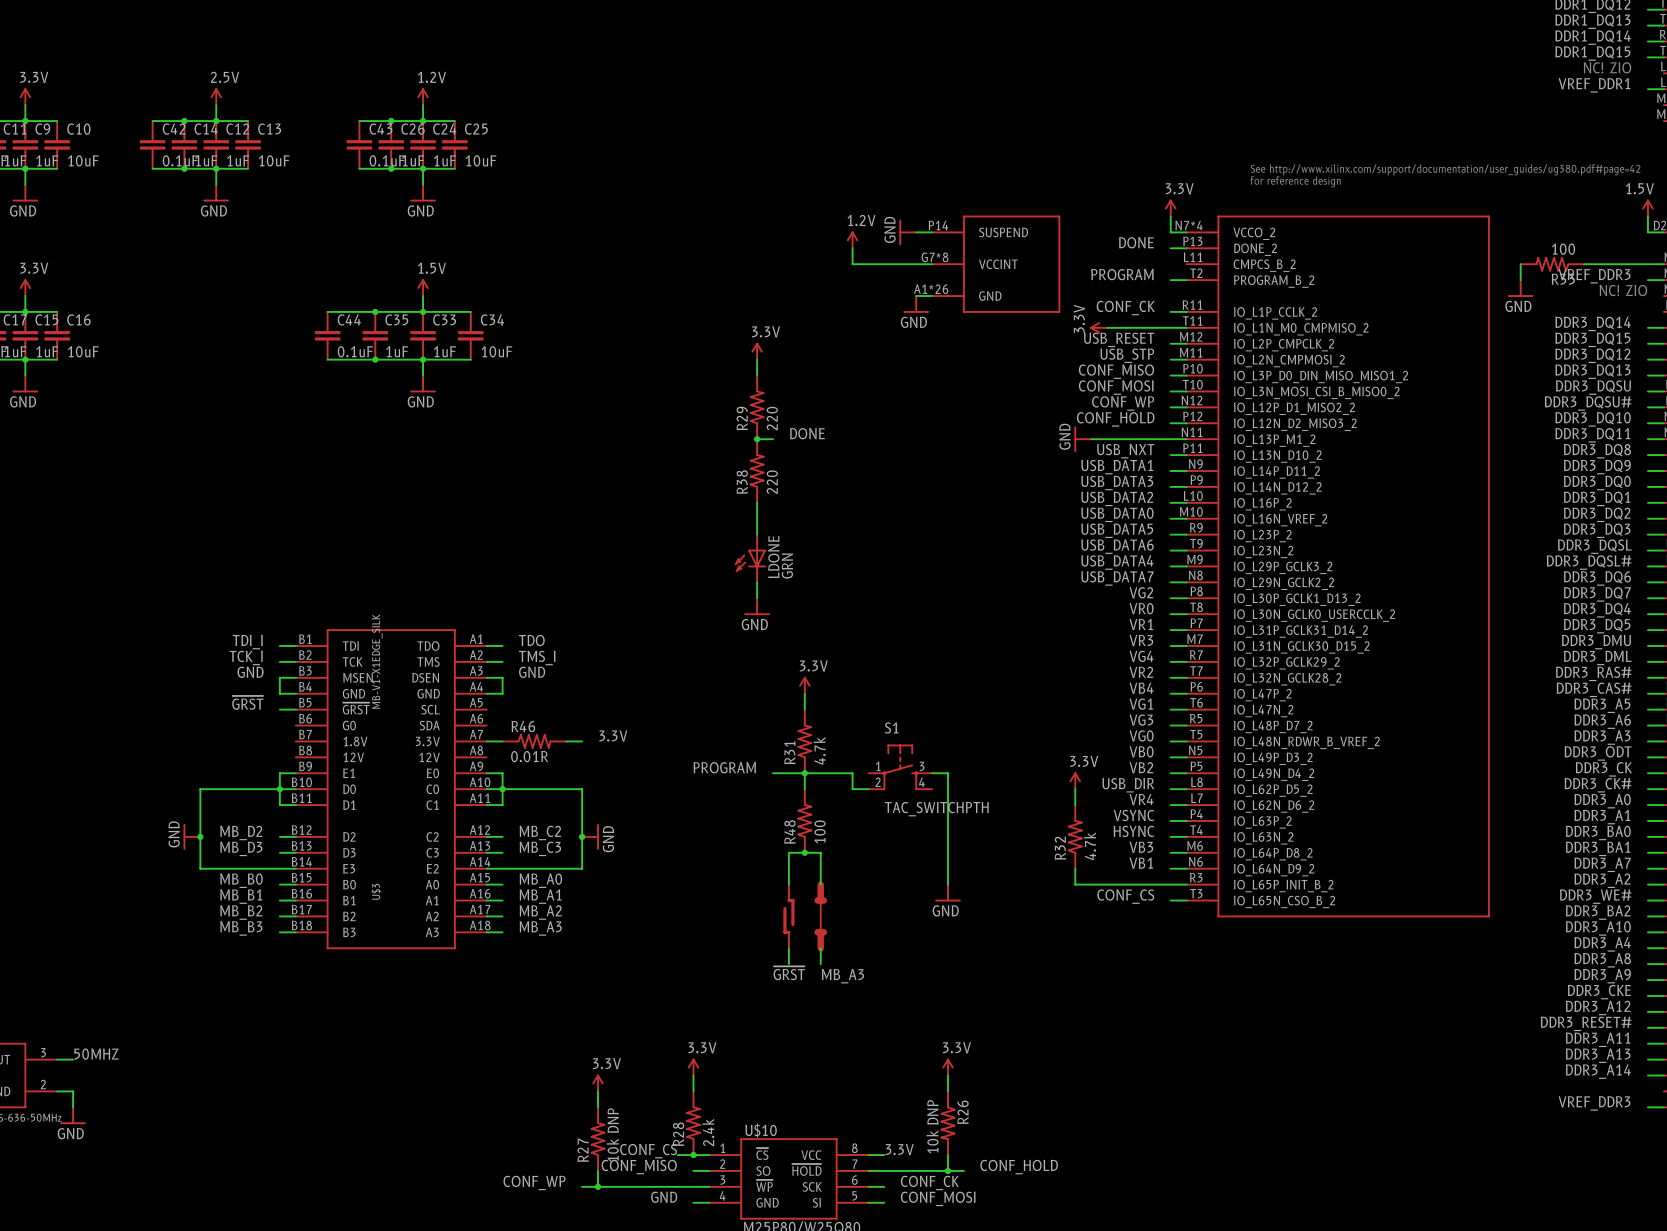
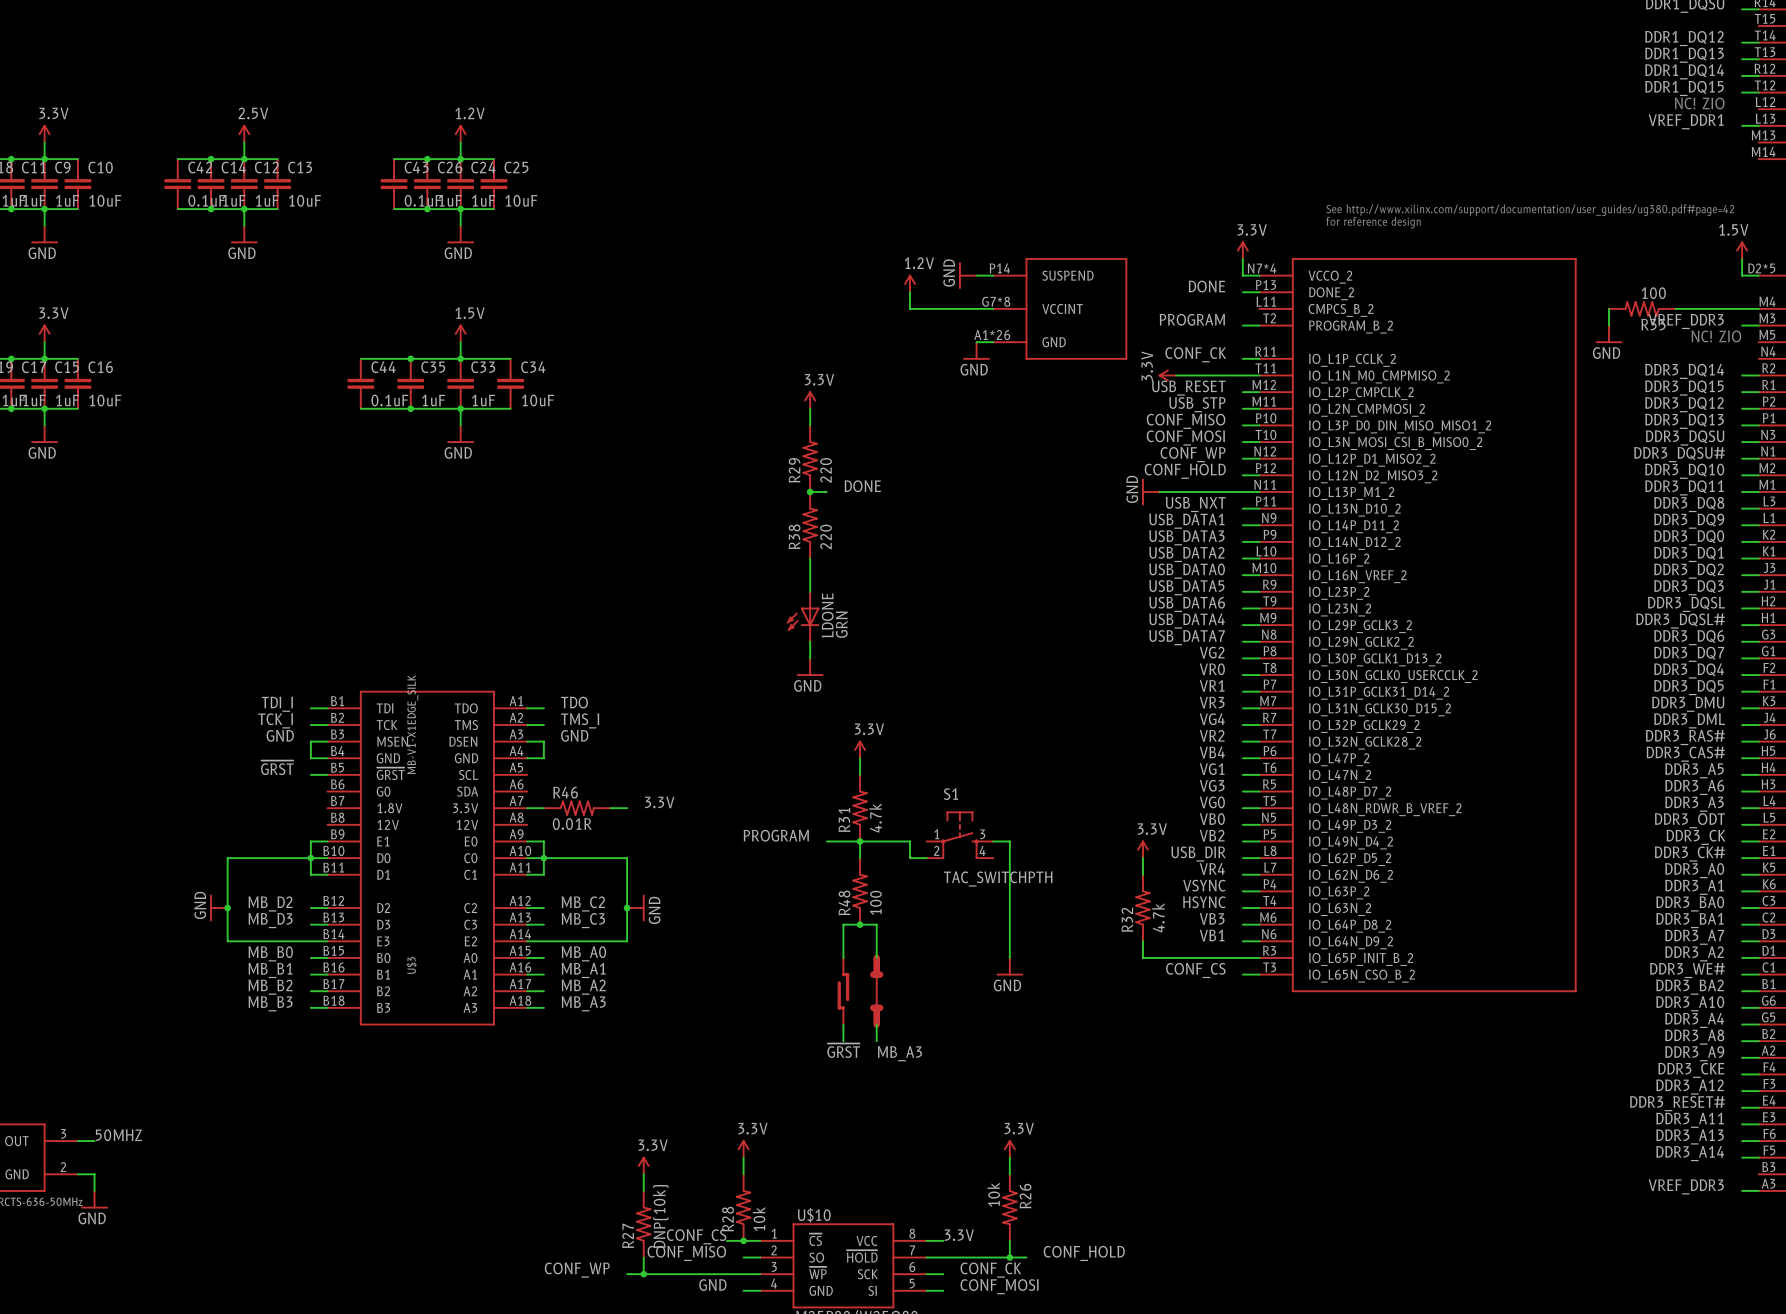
R26 value: 10k DNP (932, 1126) -> 10k (993, 1194)
R28 value: 2.4k (708, 1132) -> 10k (759, 1219)
R27 value: 10k DNP (612, 1135) -> DNP(10k) (660, 1216)

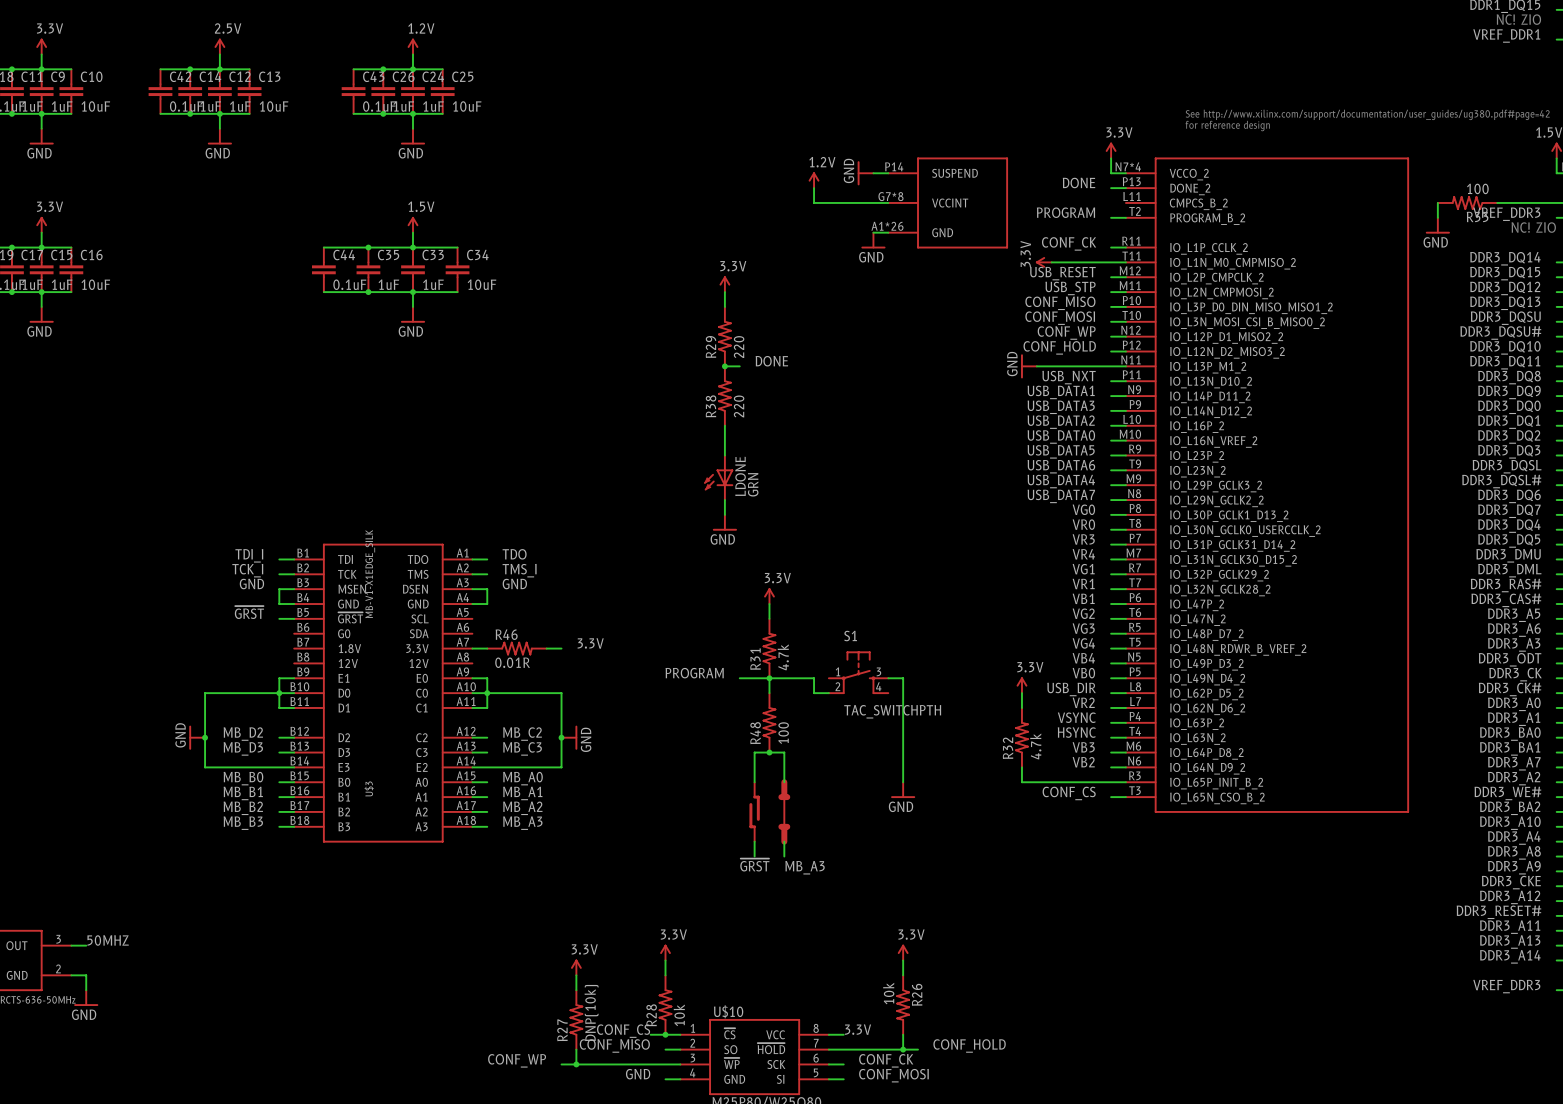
label: VG2 (1212, 652) -> VG0 (1083, 509)
label: VR1 (1212, 685) -> VR3 (1083, 539)
label: VR3 (1212, 702) -> VR4 (1083, 554)
label: VG4 (1212, 719) -> VG1 (1083, 569)
label: VR2 (1212, 735) -> VR1 (1083, 584)
label: VB4 (1212, 752) -> VB1 (1083, 598)
label: VG1 (1212, 769) -> VG2 (1083, 613)
label: VG0 (1212, 802) -> VG4 (1083, 643)
label: VB0 (1212, 819) -> VB4 (1083, 658)
label: VB2 (1212, 835) -> VB0 (1083, 673)
label: VR4 (1212, 869) -> VR2 (1083, 702)
label: VB1 (1212, 935) -> VB2 (1083, 762)

